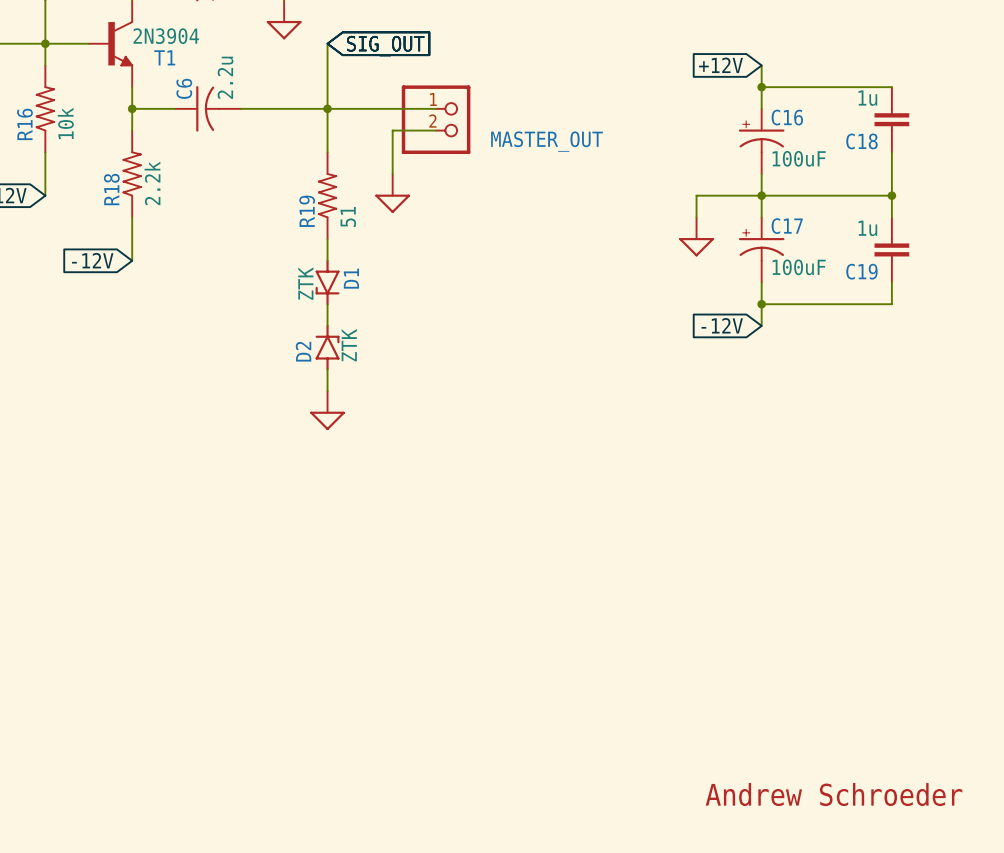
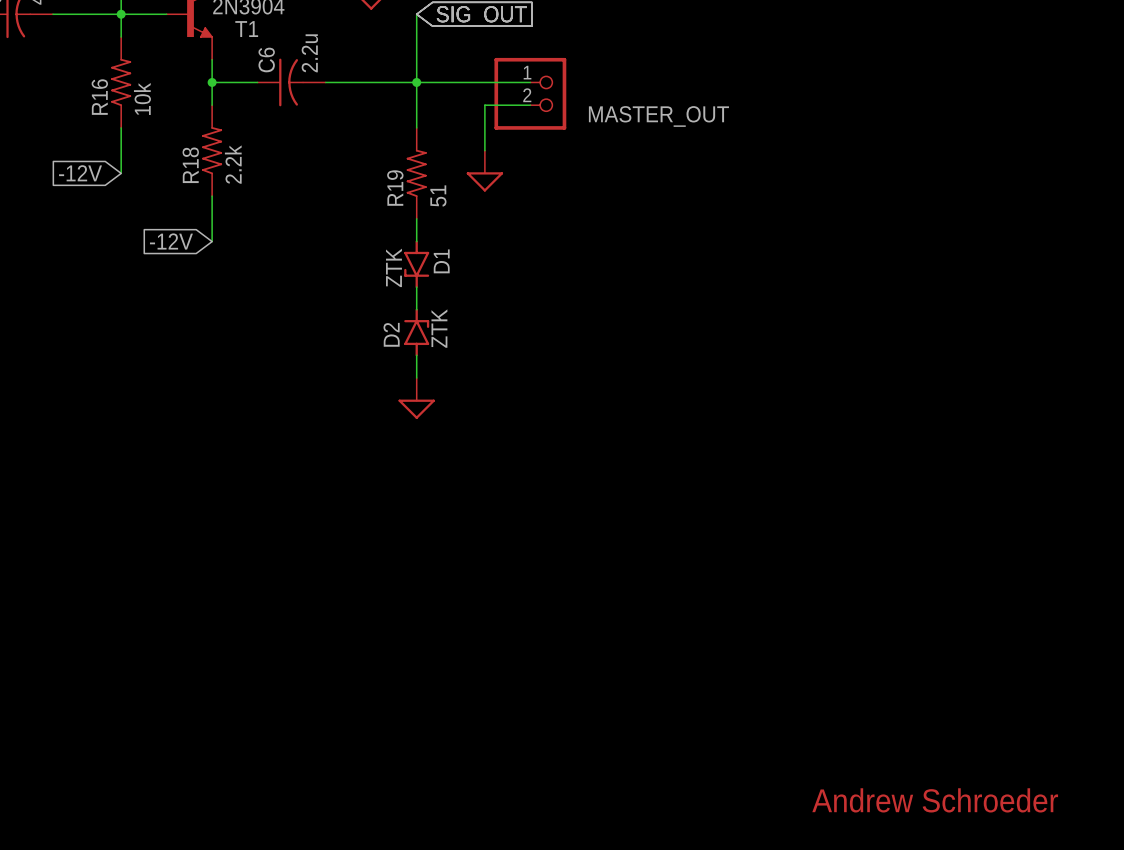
global label: +12V (720, 65) -> none
wire: (761, 65) (761, 108) -> none
wire: (761, 87) (891, 87) -> none
junction: (761, 87) -> none
C18: 1u (891, 119) -> none
C16: 100uF (761, 141) -> none
wire: (891, 152) (891, 217) -> none
wire: (761, 173) (761, 217) -> none
junction: (761, 195) -> none
wire: (891, 195) (696, 195) (696, 217) -> none
junction: (891, 195) -> none
power symbol: (696, 236) -> none
C17: 100uF (761, 249) -> none
C19: 1u (891, 249) -> none
wire: (761, 282) (761, 325) -> none
wire: (891, 282) (891, 304) (761, 304) -> none
junction: (761, 304) -> none
global label: -12V (722, 325) -> none

